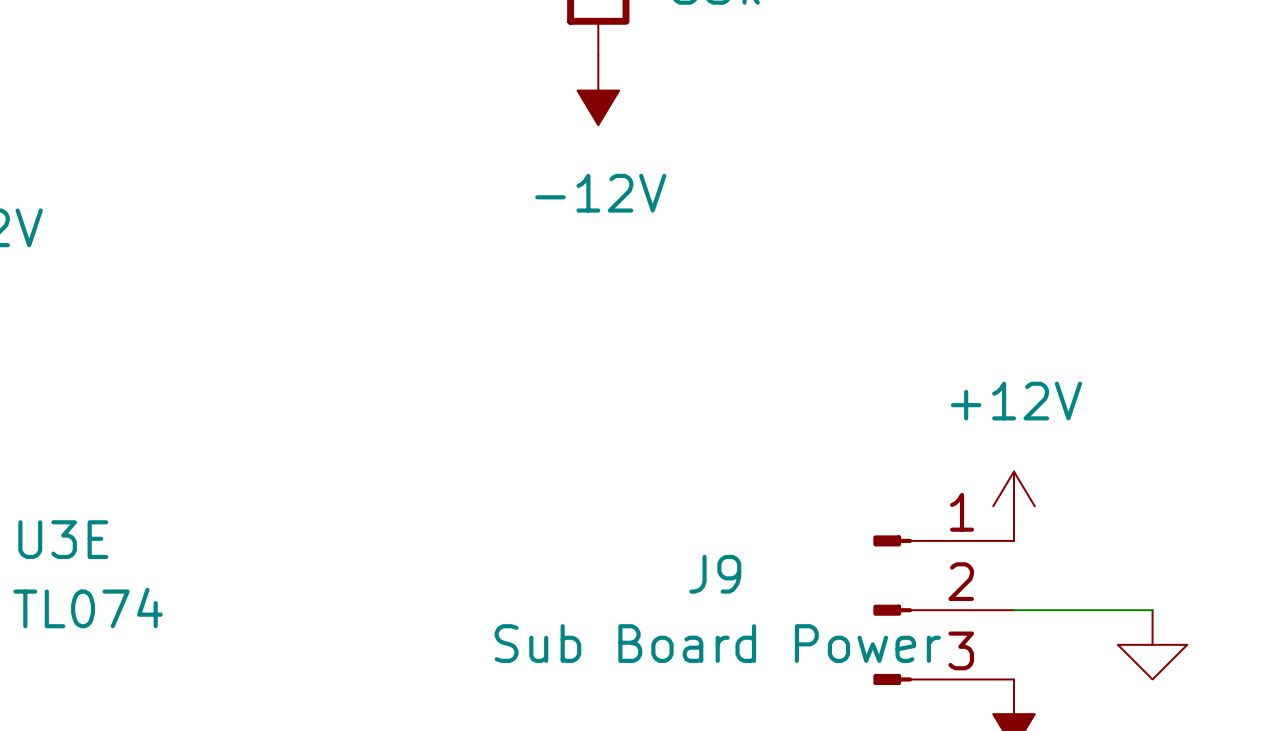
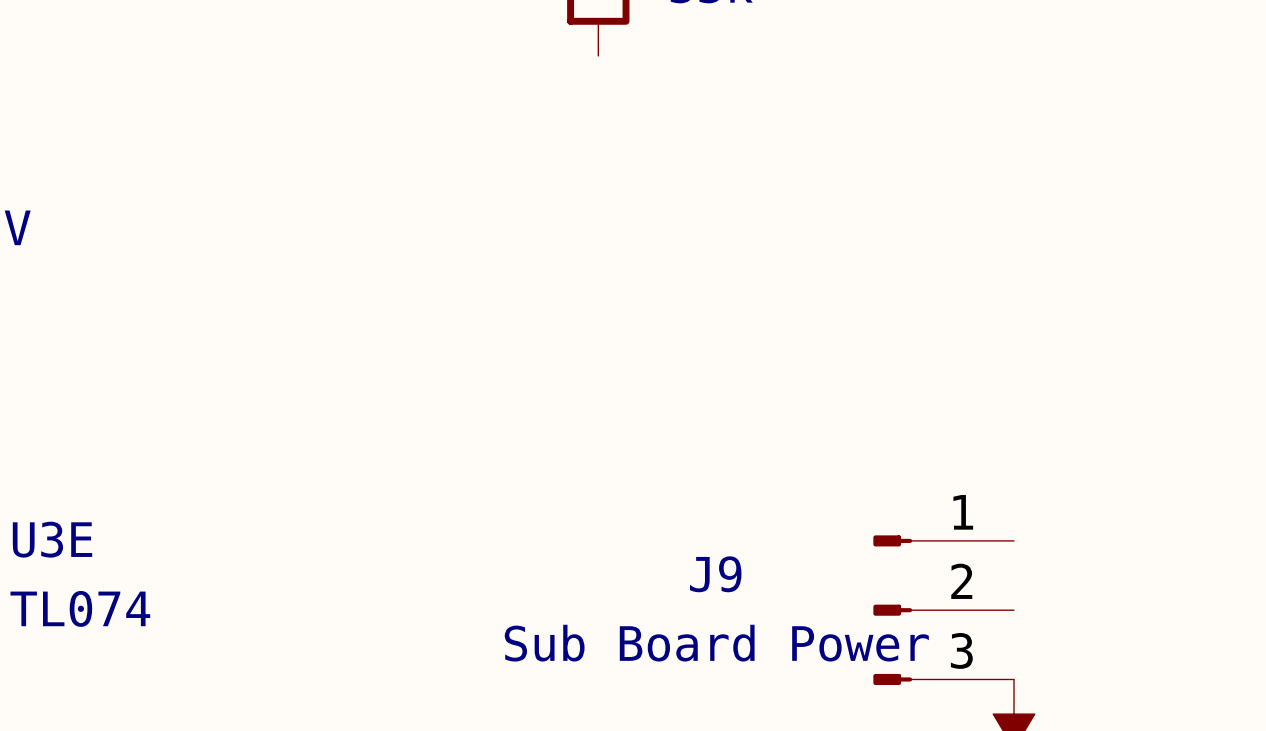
power symbol: -12V (598, 90) -> none
power symbol: +12V (1014, 506) -> none
wire: (1014, 610) (1152, 610) -> none
power symbol: (1152, 644) -> none

